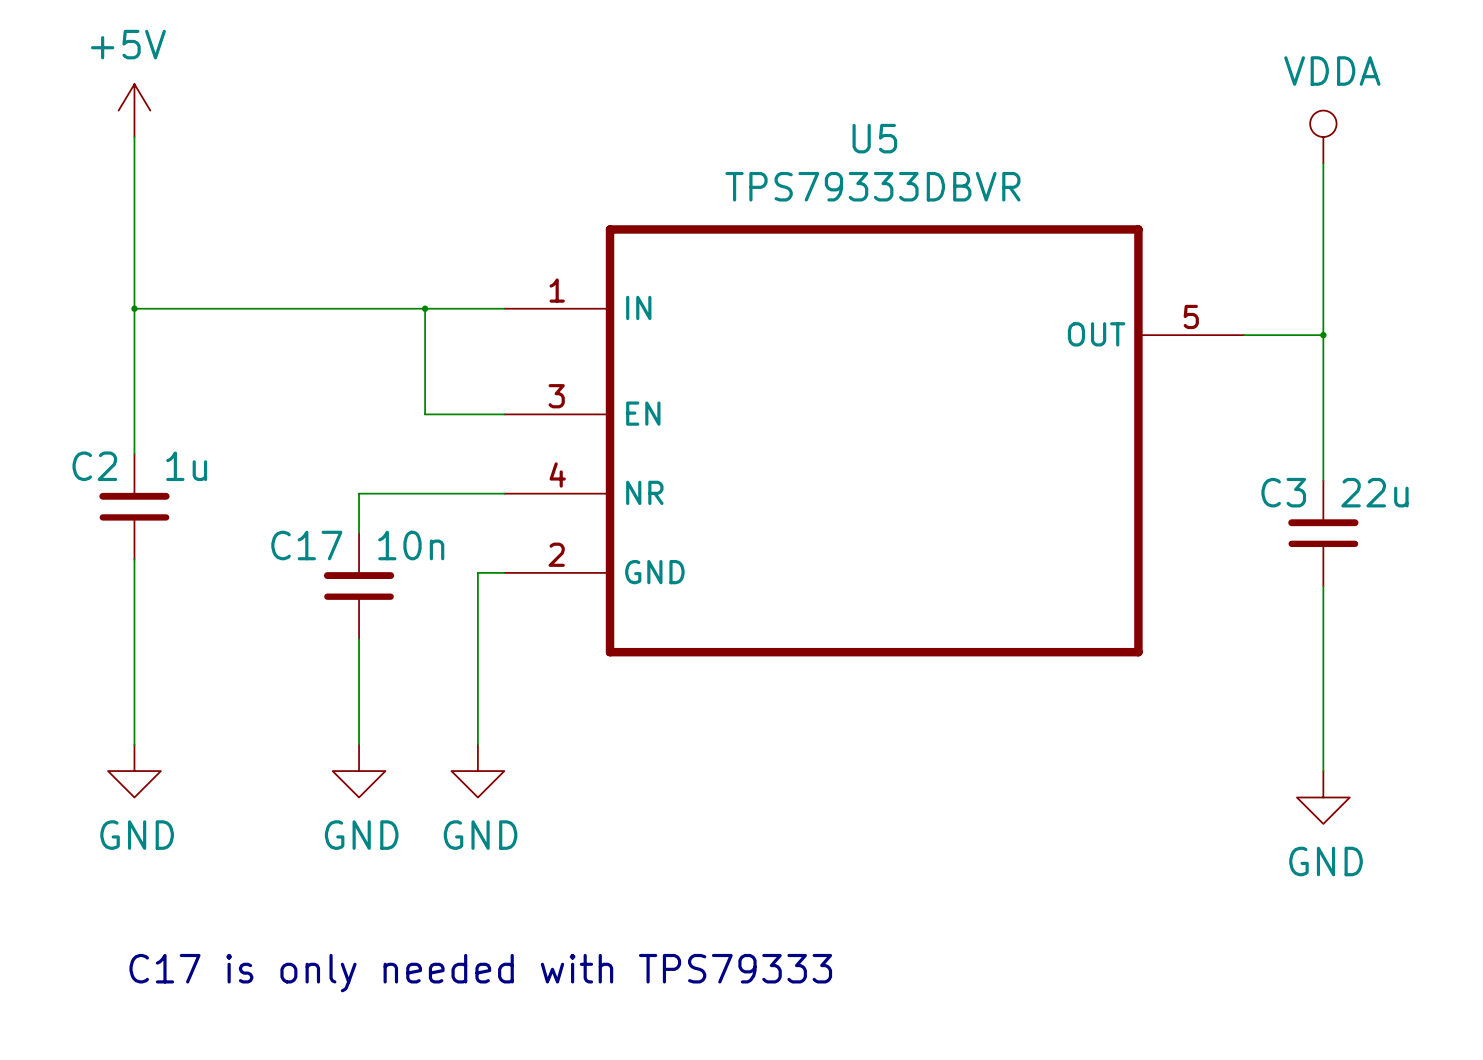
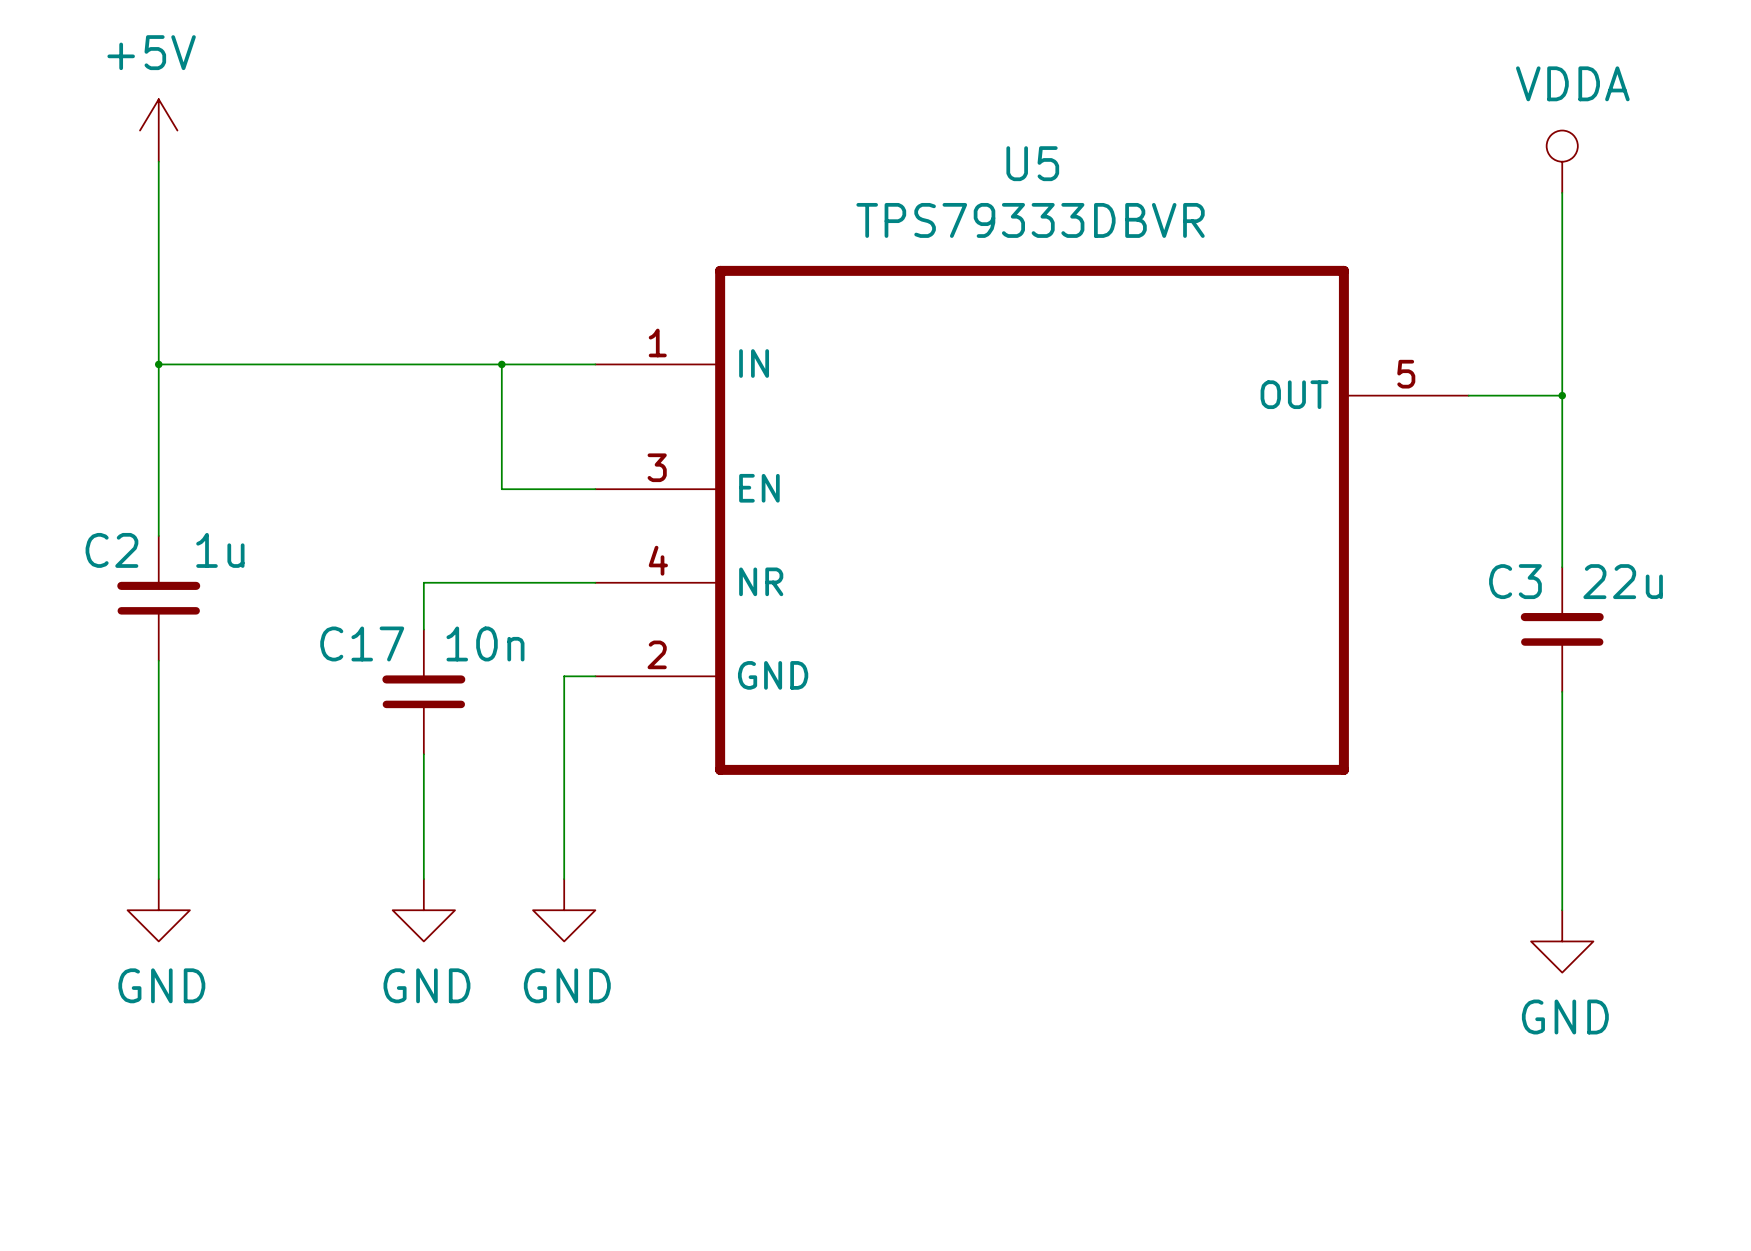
text: C17 is only needed with TPS79333 (480, 973) -> none

